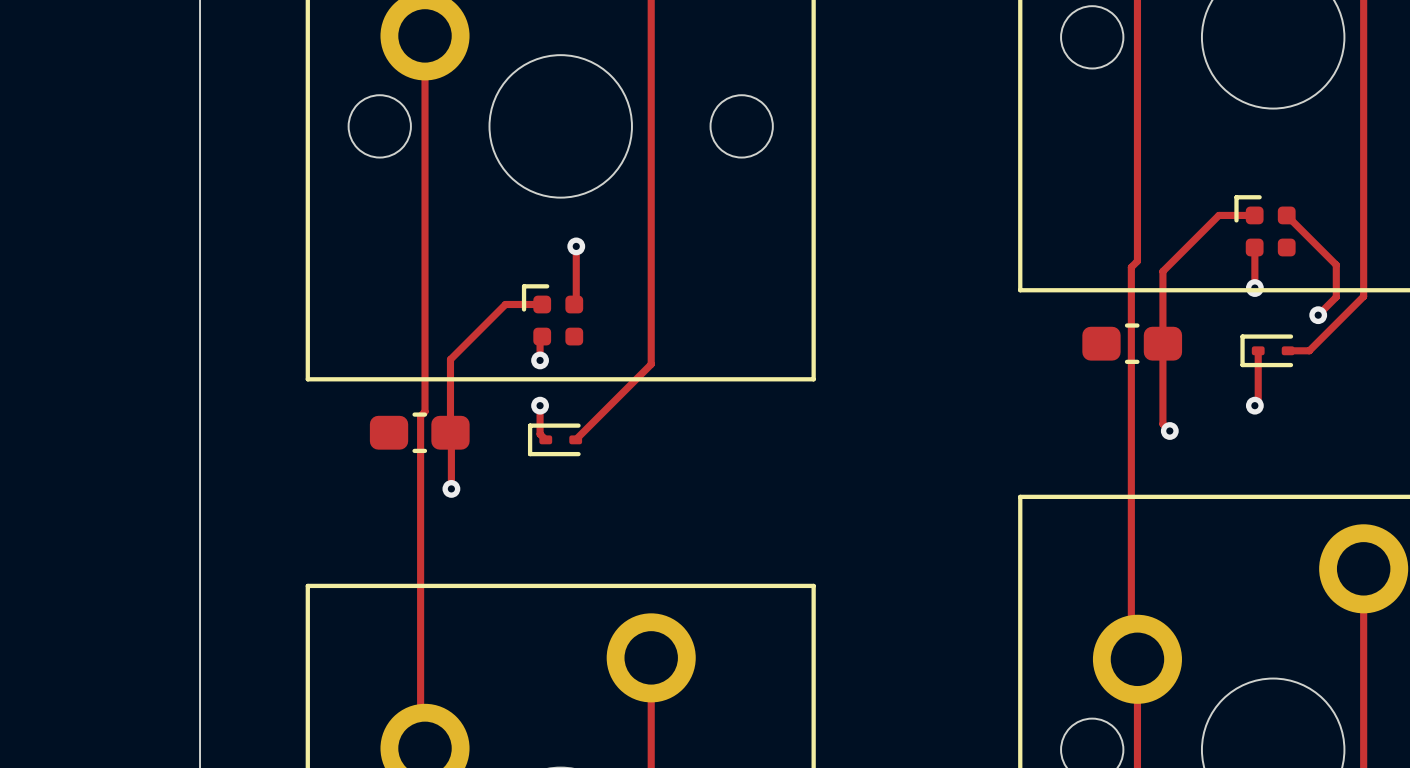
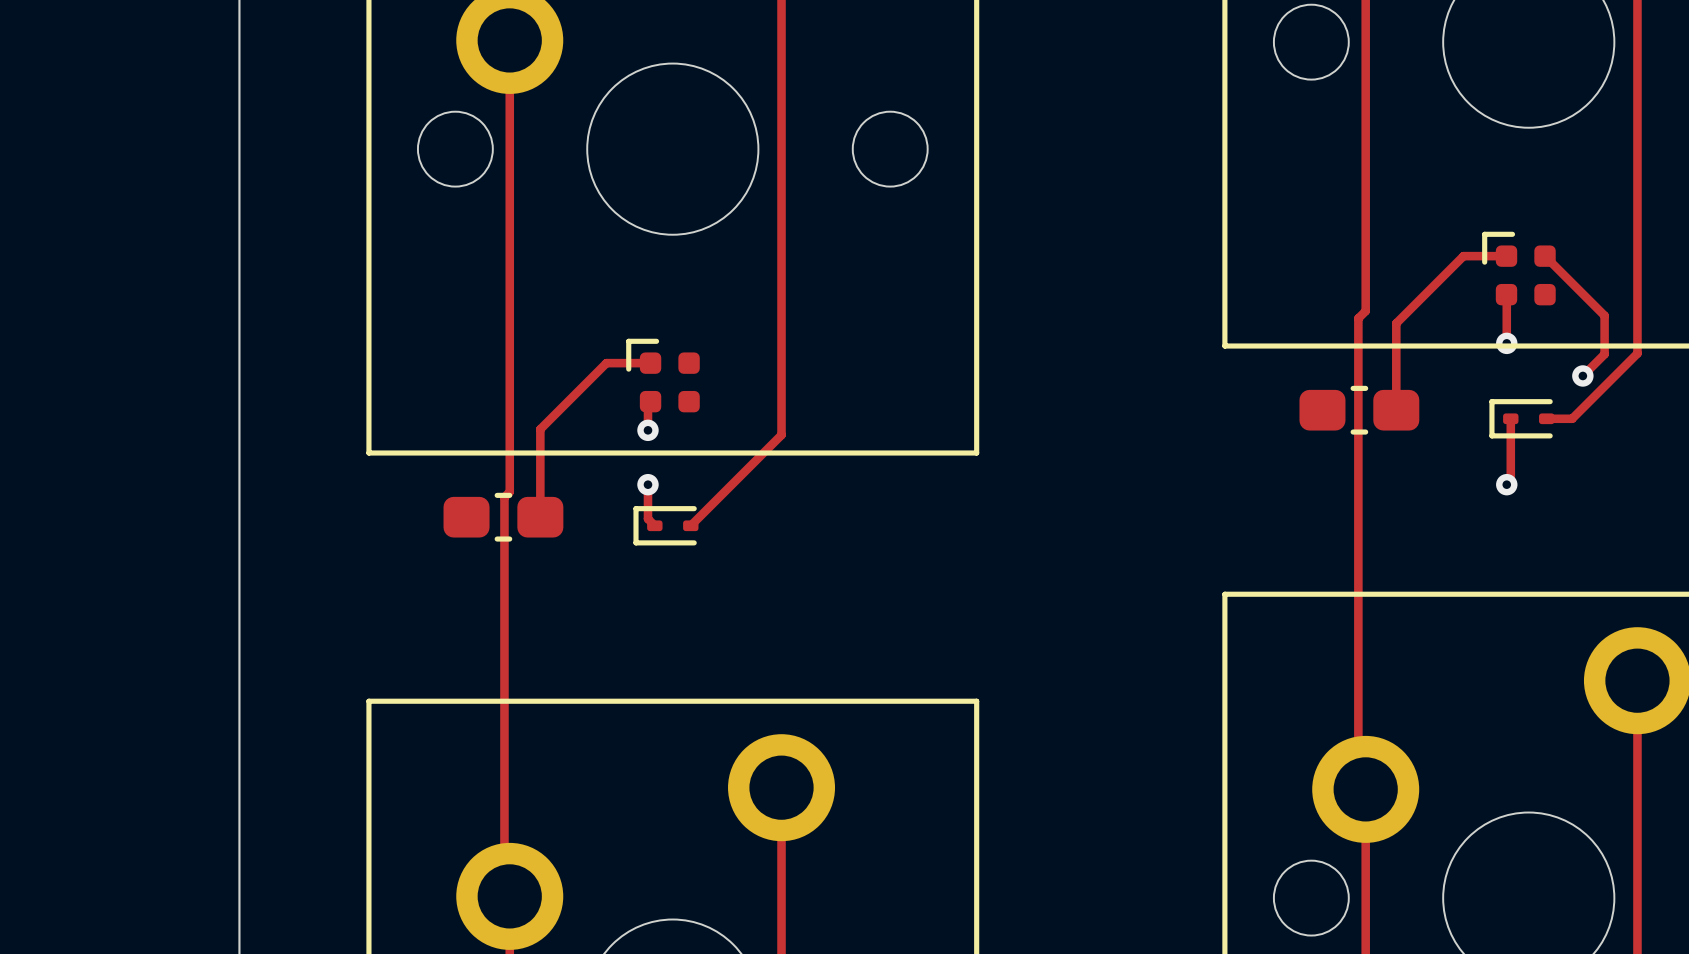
track: (576, 246) (576, 302) (574, 304) -> none
via: (576, 246) -> none
track: (1162, 343) (1162, 424) (1169, 431) -> none
via: (1169, 431) -> none
track: (450, 432) (451, 488) -> none
via: (451, 488) -> none

